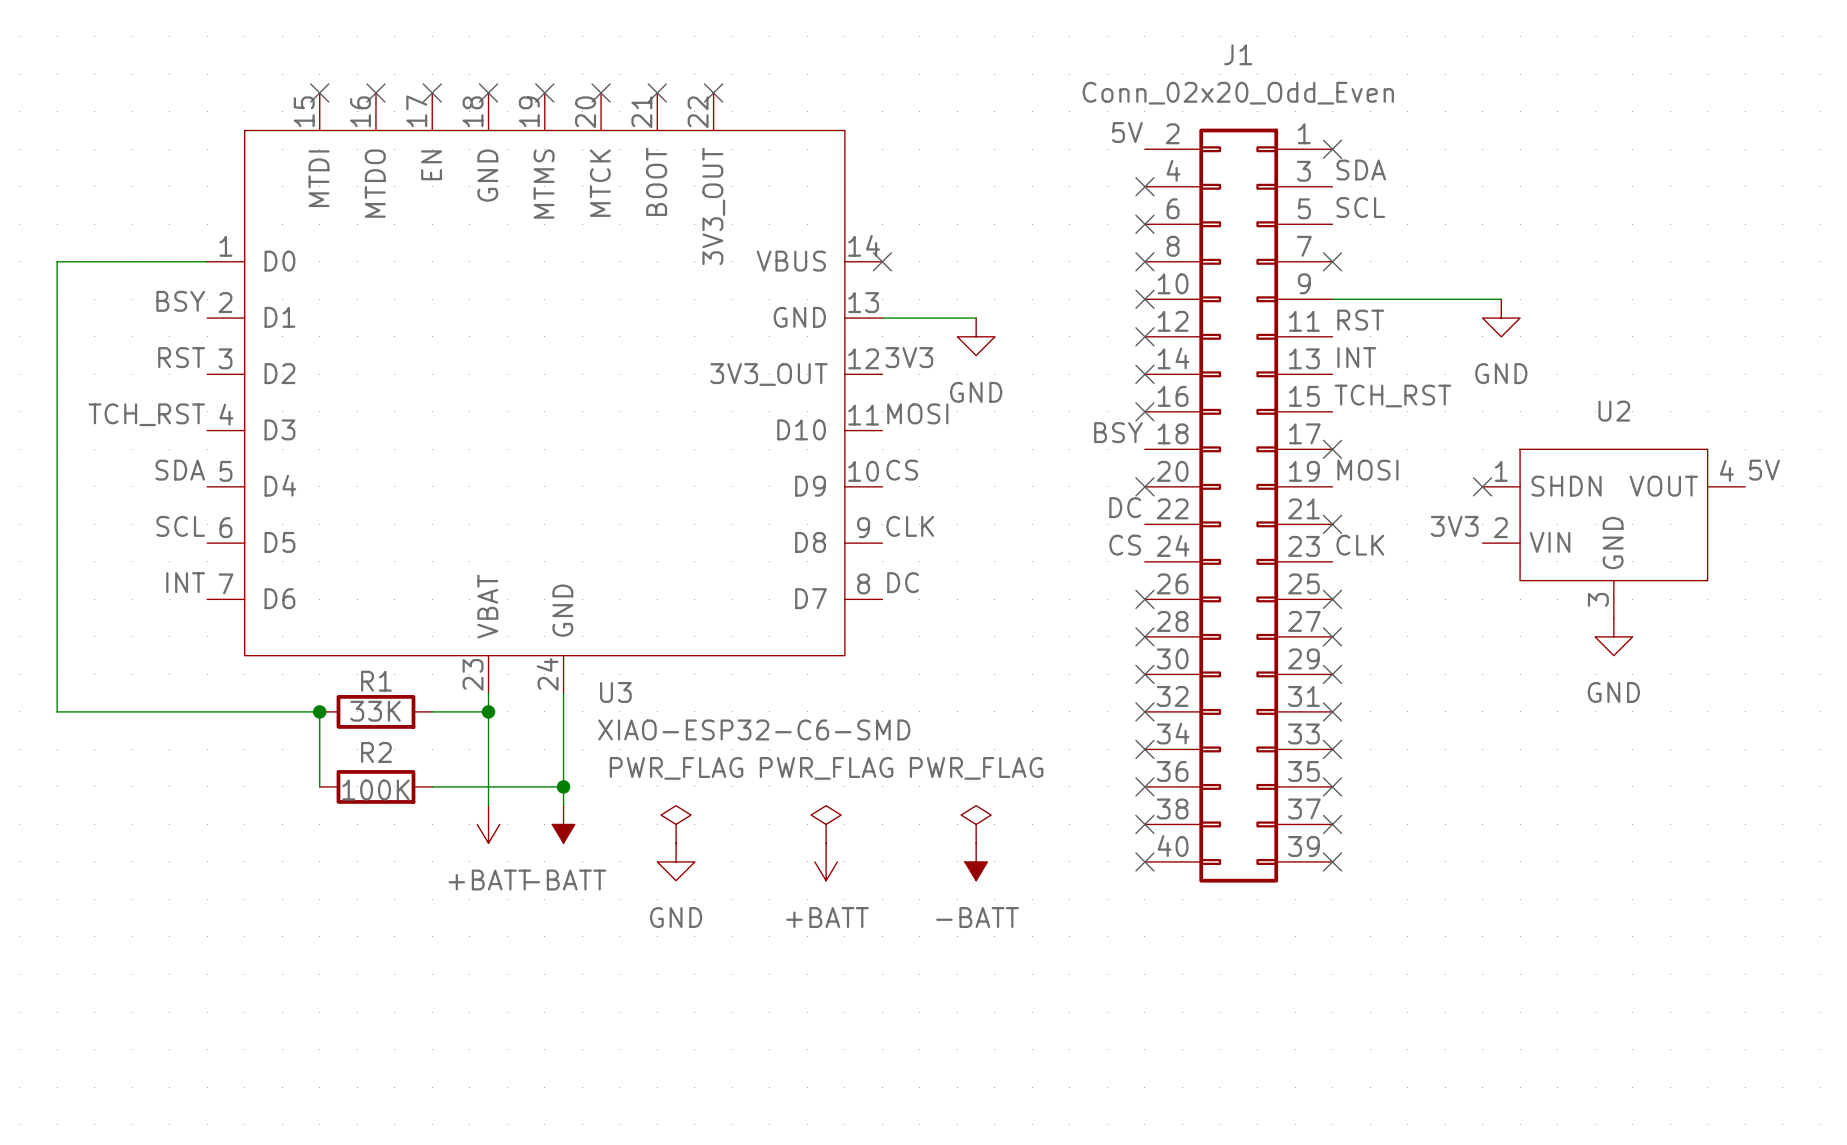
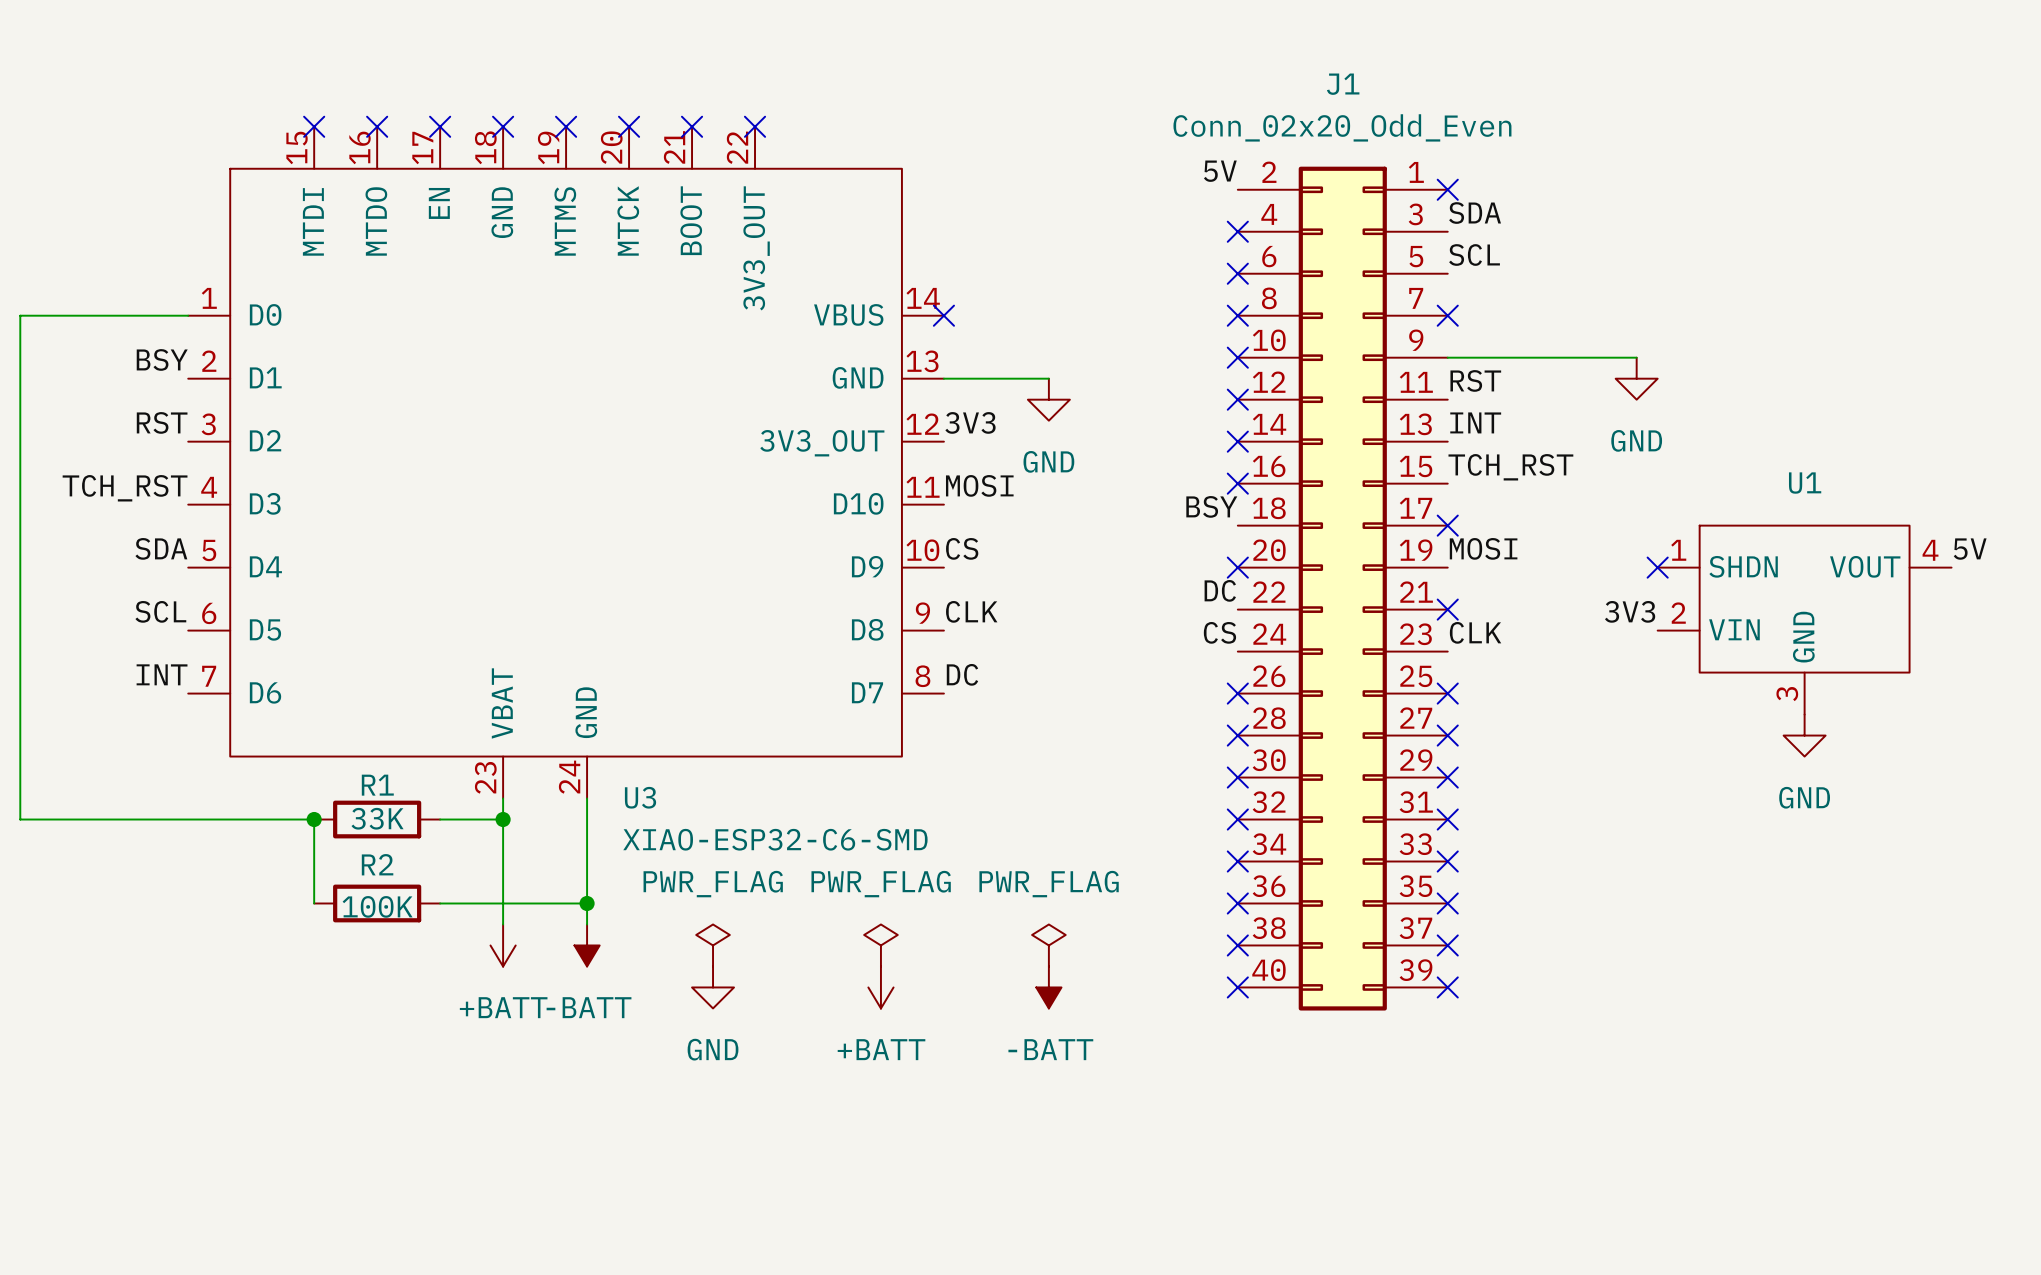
label position: 5V (1764, 470) -> 5V (1970, 549)
no-connect mark position: (1482, 486) -> (1657, 567)
label position: 3V3 (1454, 526) -> 3V3 (1630, 611)
U2: (1613, 533) -> none
U1: none -> (1804, 620)
power symbol position: GND (1613, 636) -> GND (1804, 735)

